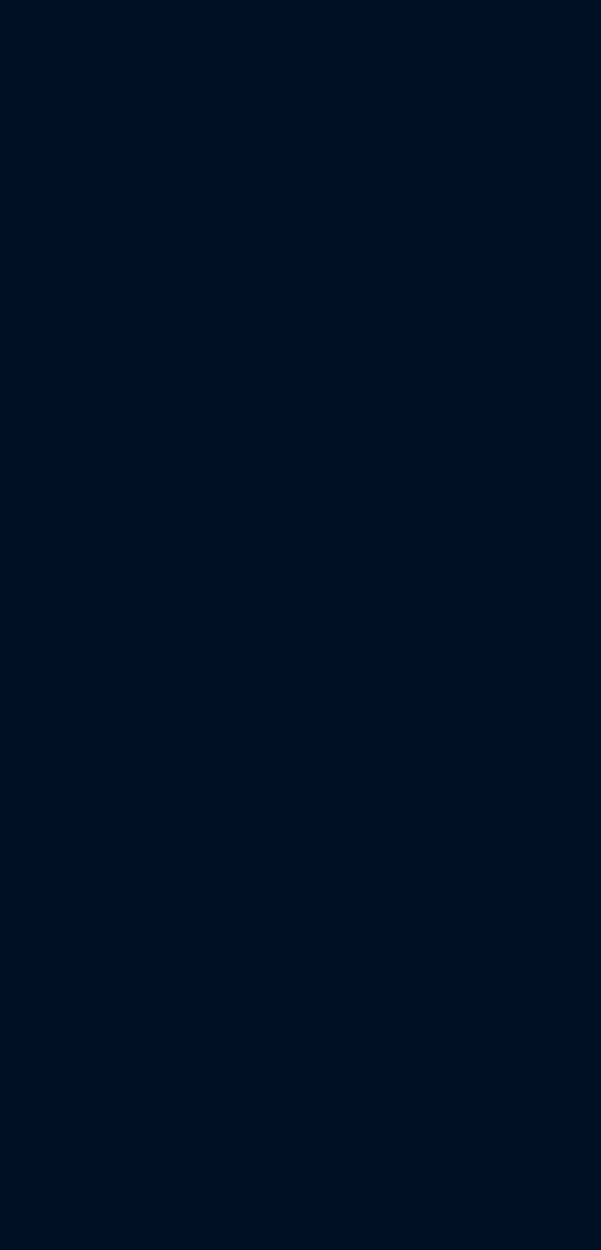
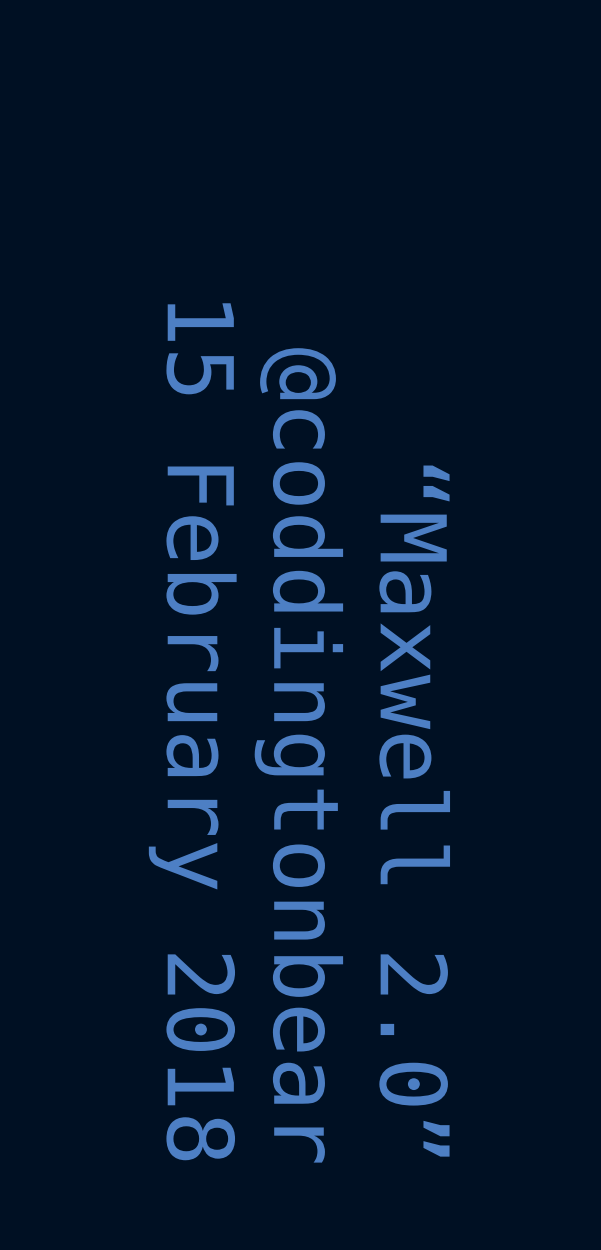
text: none -> 15 February 2018 (192, 731)
text: none -> @coddingtonbear (298, 755)
text: none -> “Maxwell 2.0” (414, 811)

